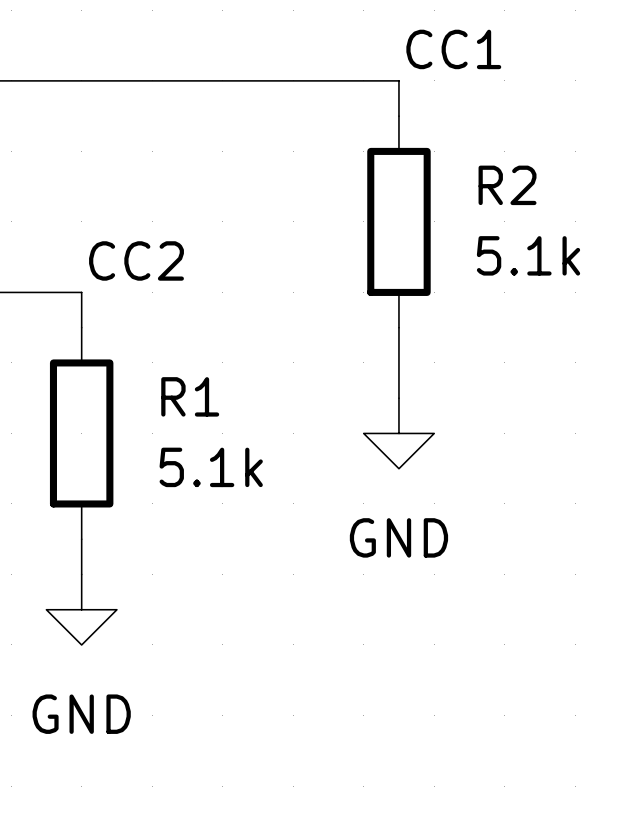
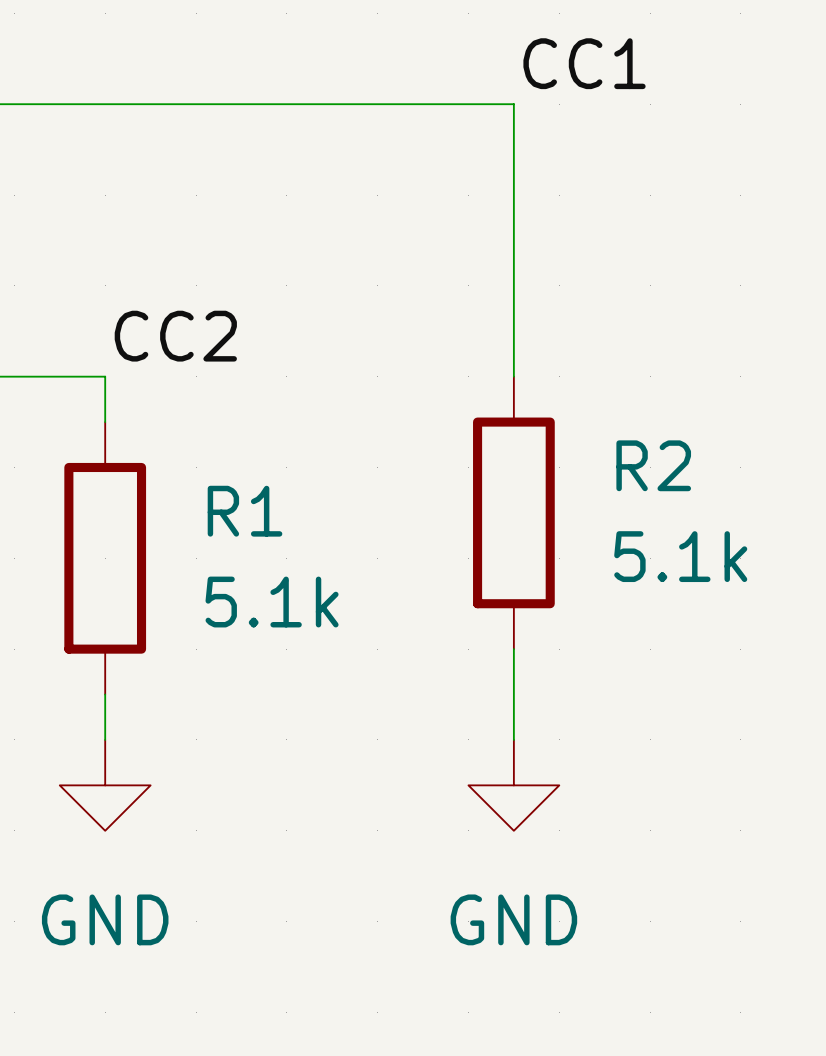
wire: none -> (513, 149) (513, 376)
R2 position: (398, 221) -> (513, 512)
wire: (398, 327) (398, 398) -> (513, 649) (513, 739)
power symbol position: GND (398, 433) -> GND (513, 785)

